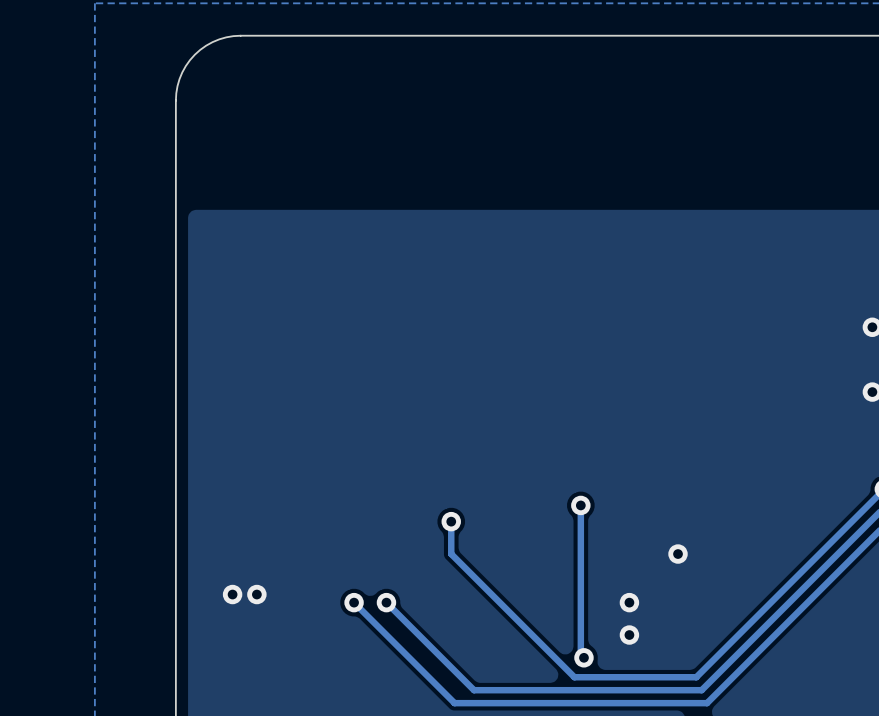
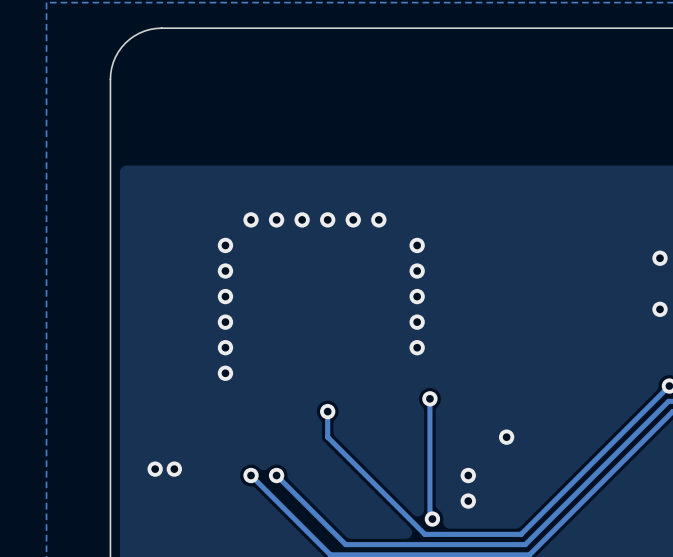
via: none -> (251, 219)
via: none -> (276, 219)
via: none -> (302, 219)
via: none -> (327, 219)
via: none -> (353, 219)
via: none -> (378, 219)
via: none -> (225, 245)
via: none -> (417, 245)
via: none -> (225, 271)
via: none -> (417, 271)
via: none -> (225, 296)
via: none -> (417, 296)
via: none -> (225, 322)
via: none -> (417, 322)
via: none -> (225, 347)
via: none -> (417, 347)
via: none -> (225, 373)

